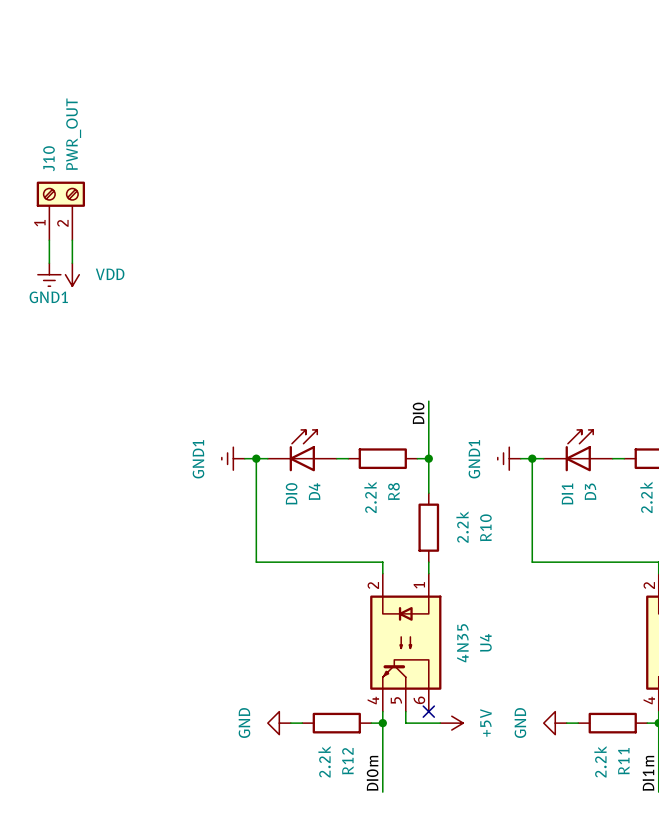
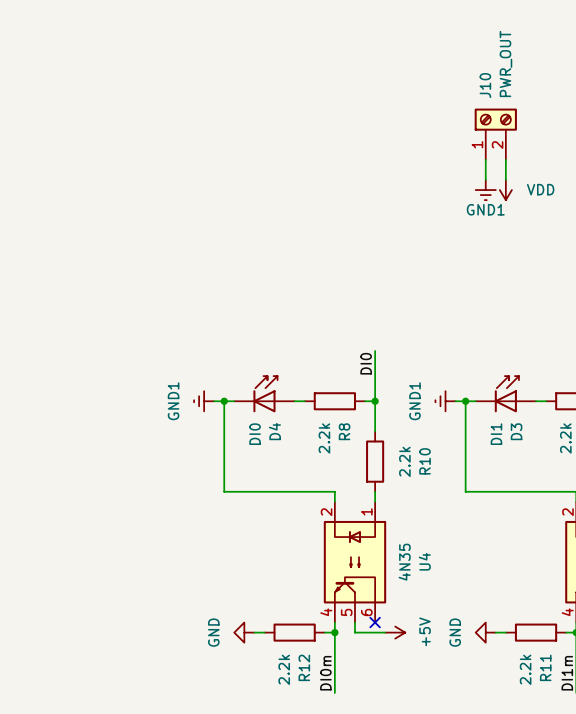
wire: none -> (485, 159) (485, 179)
wire: none -> (505, 159) (505, 179)
J10 position: (60, 210) -> (495, 134)
power symbol: none -> GND1 (485, 190)
power symbol: none -> VDD (505, 190)
wire: (49, 240) (49, 263) -> none
wire: (72, 240) (72, 263) -> none
power symbol: GND1 (49, 274) -> none
power symbol: VDD (72, 274) -> none

